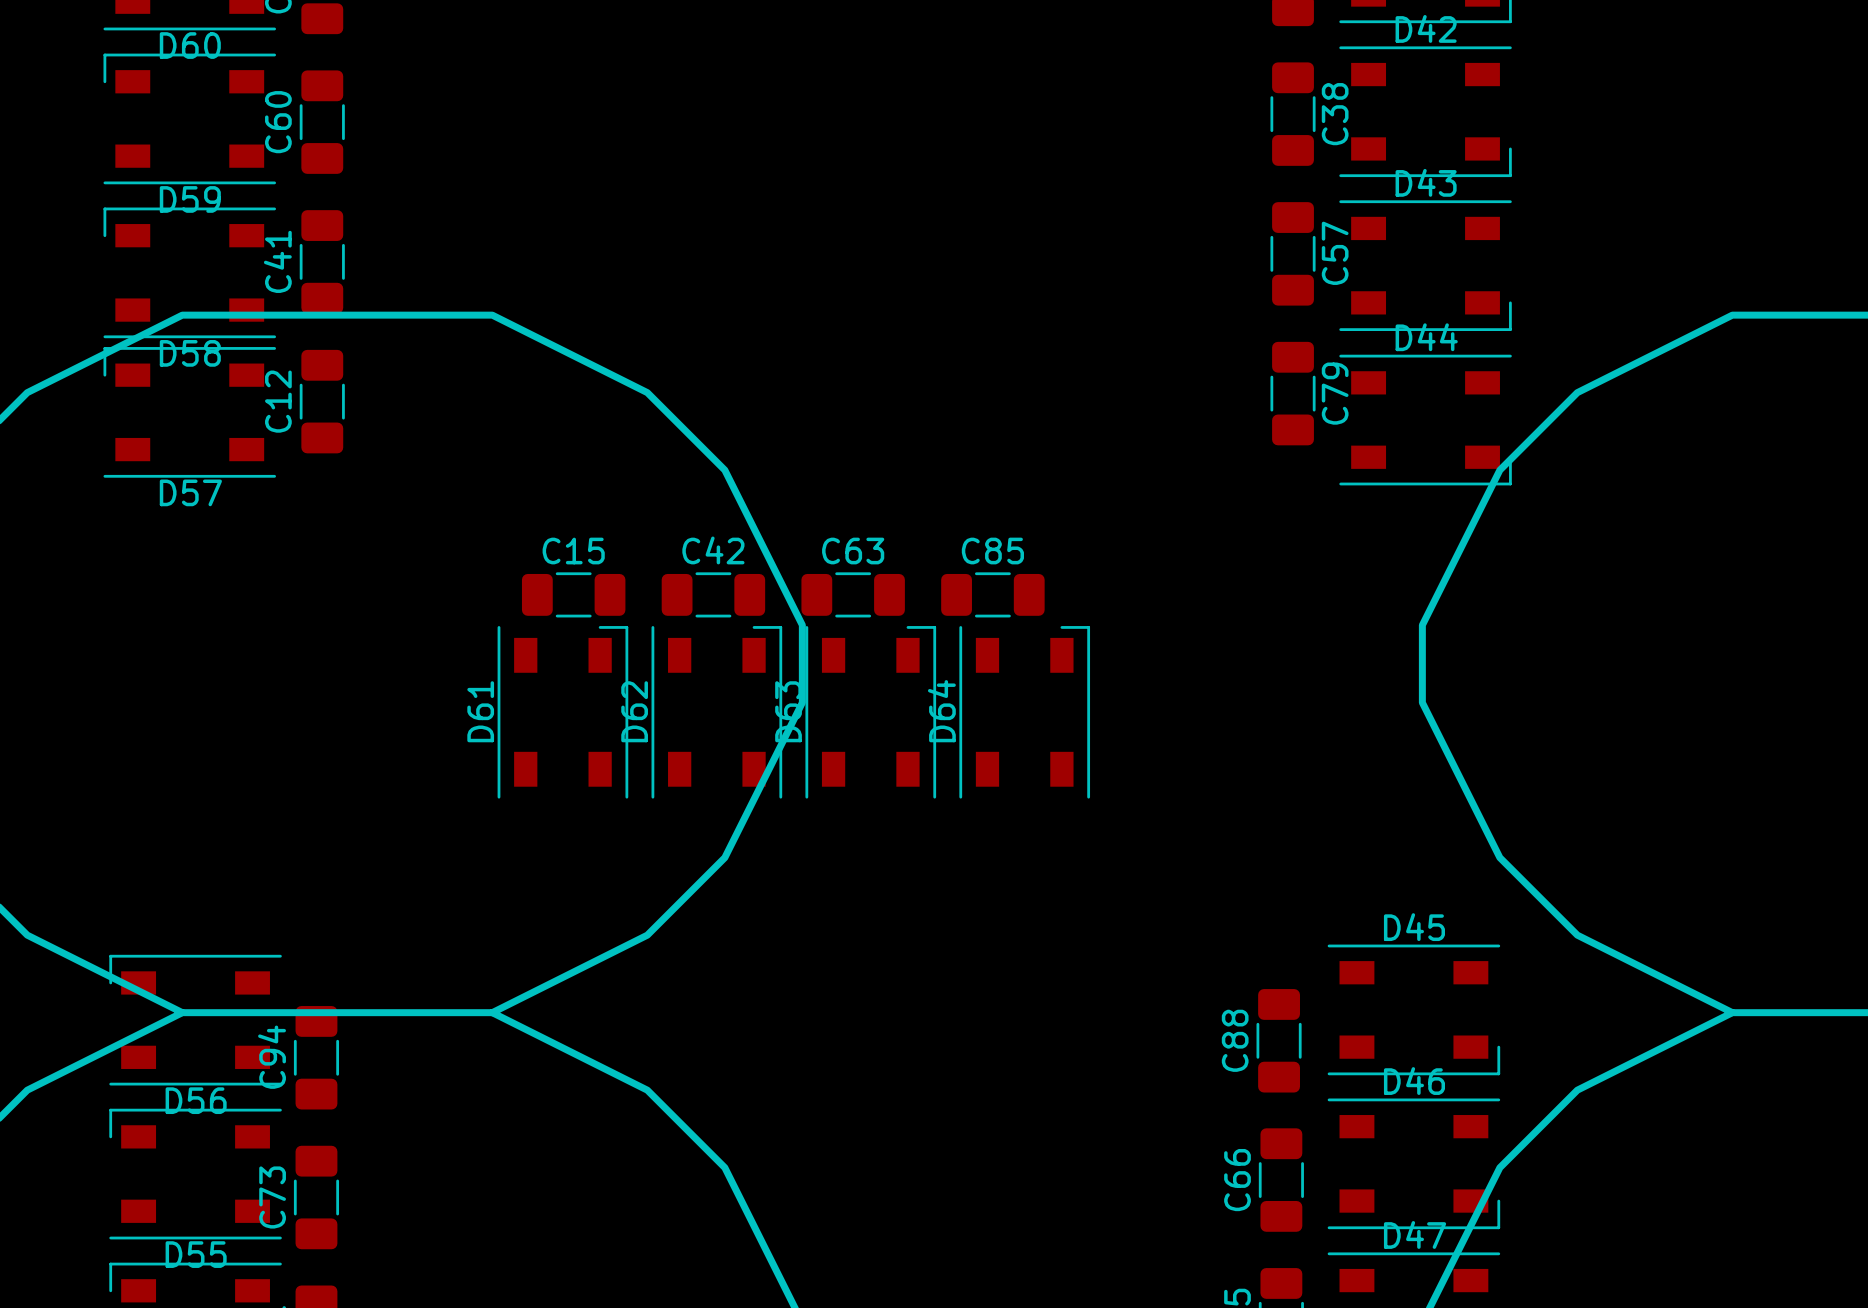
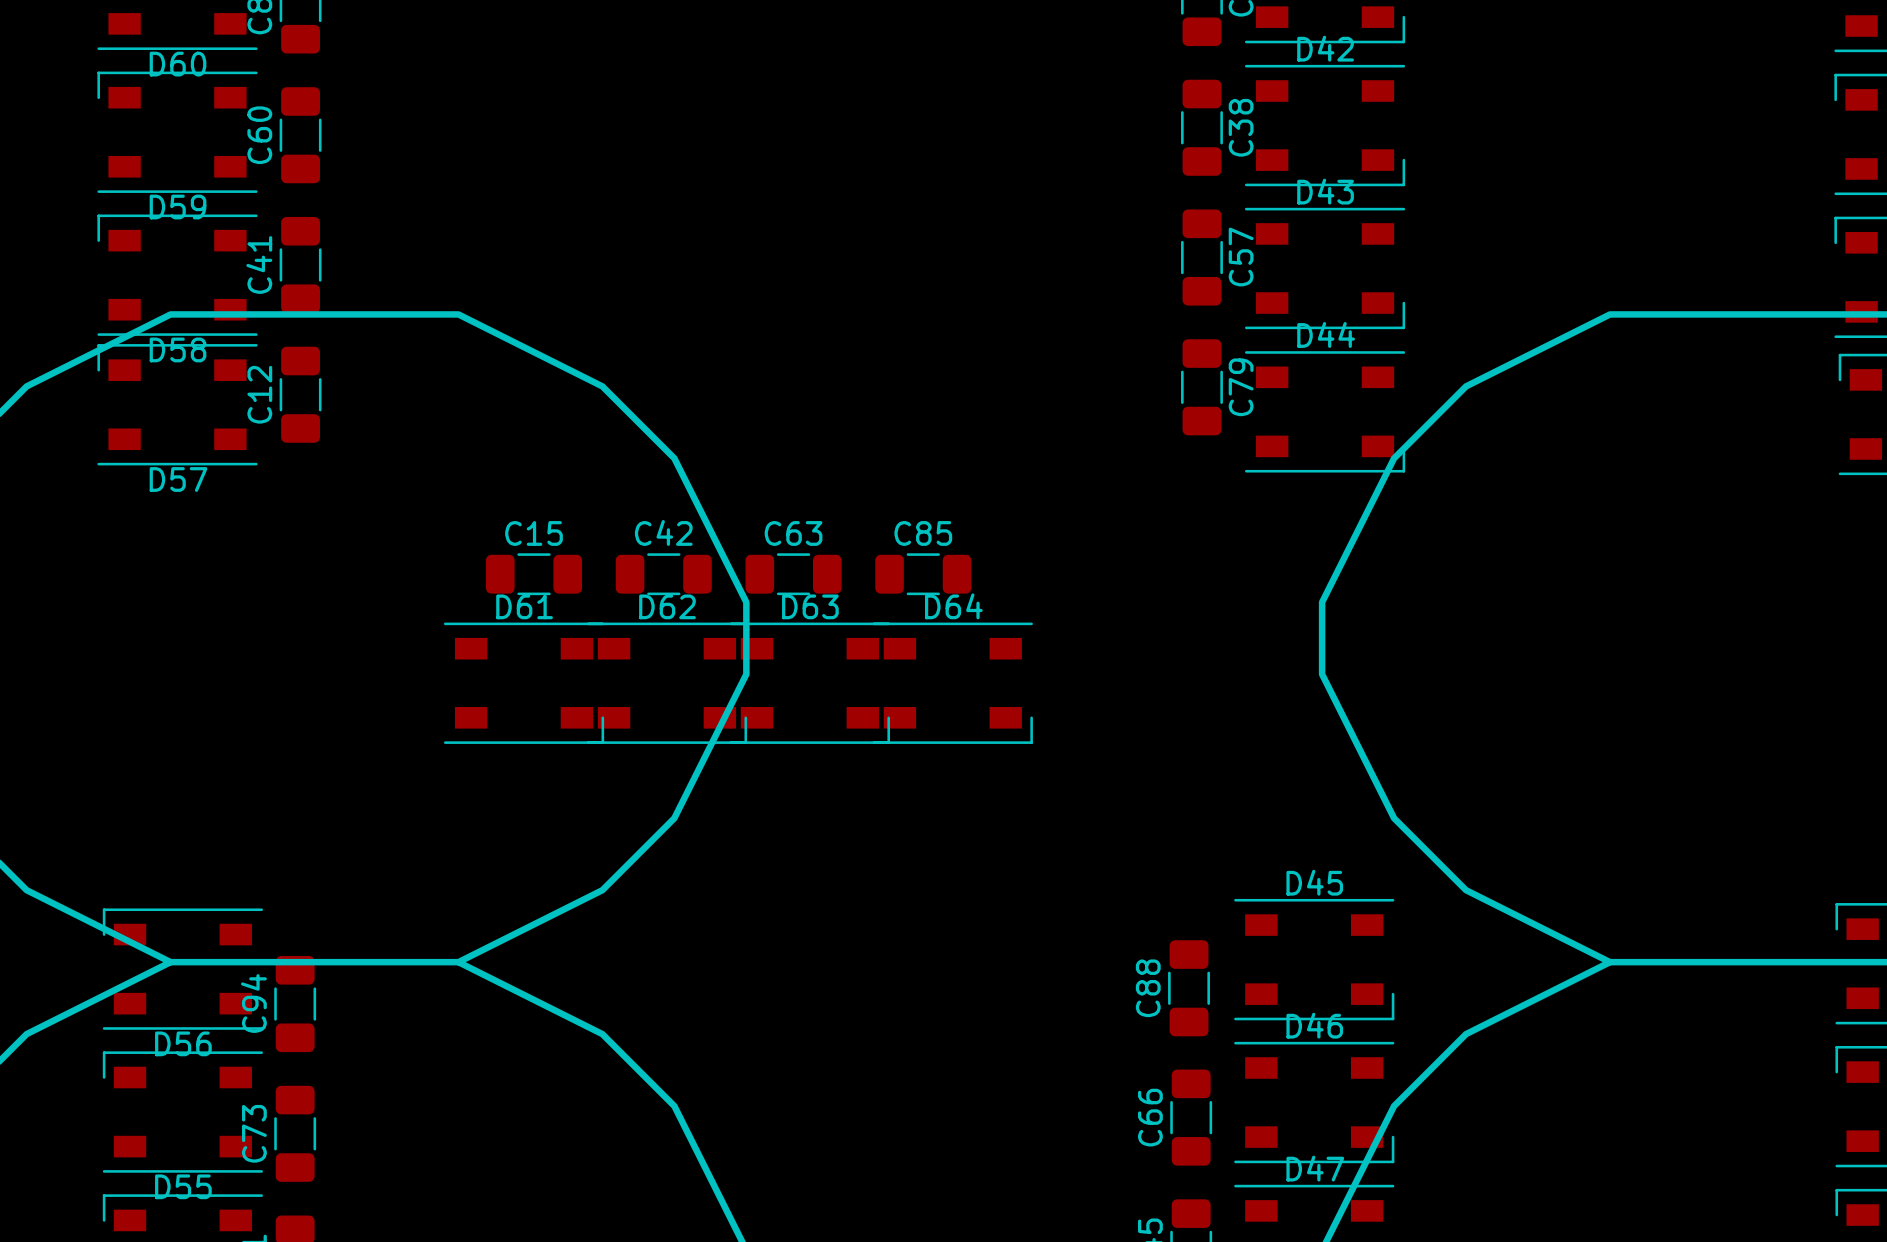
D61 rotation: 0° (562, 712) -> 90° clockwise (524, 683)
D62 rotation: 0° (716, 712) -> 90° clockwise (666, 683)
D63 rotation: 0° (870, 712) -> 90° clockwise (809, 683)
D64 rotation: 0° (1024, 712) -> 90° clockwise (952, 683)

